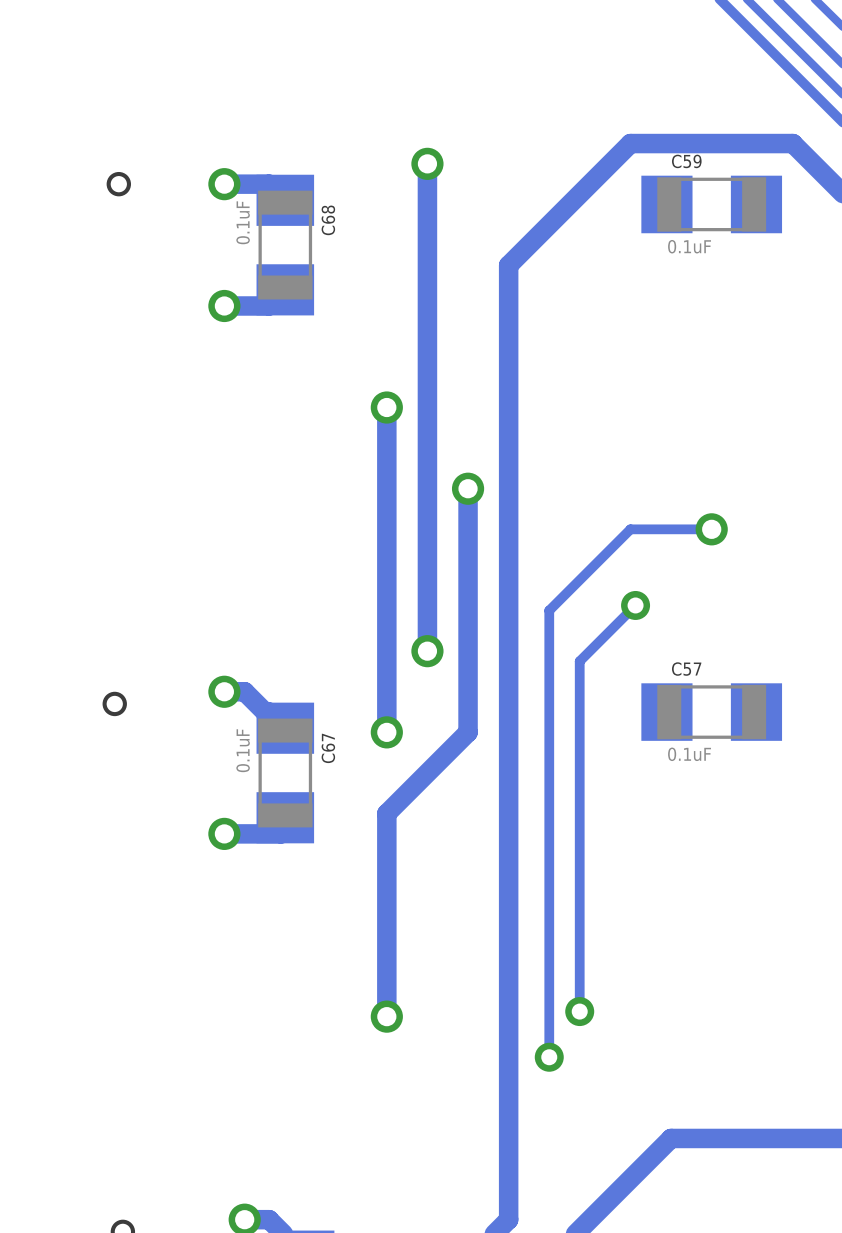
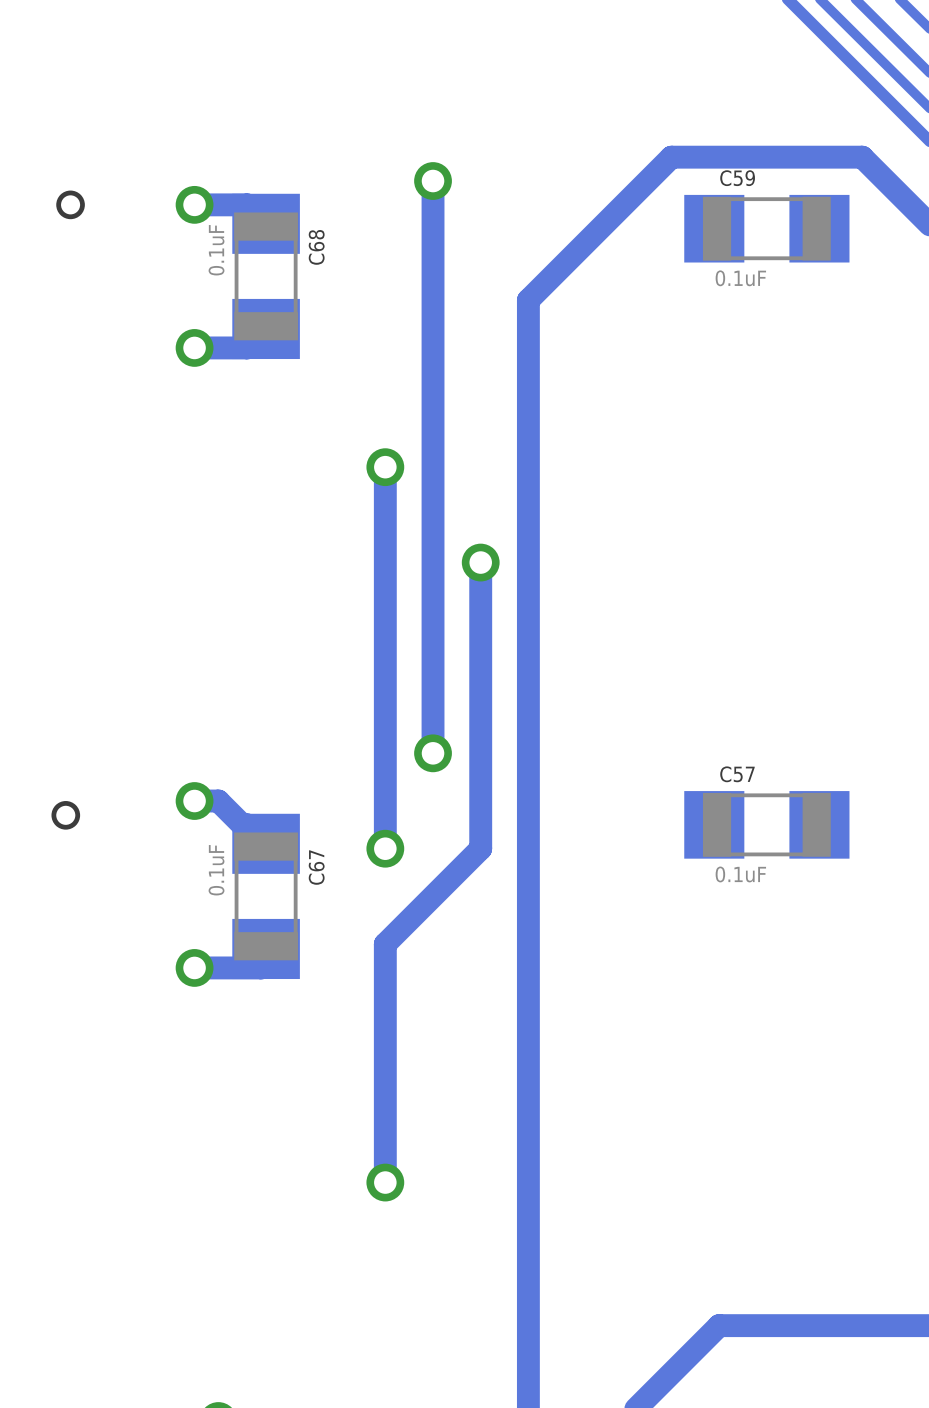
track: (711, 529) (630, 529) (549, 610) (549, 1057) -> none
via: (711, 529) -> none
track: (635, 605) (579, 661) (579, 1011) -> none
via: (635, 605) -> none
via: (579, 1011) -> none
via: (549, 1057) -> none

